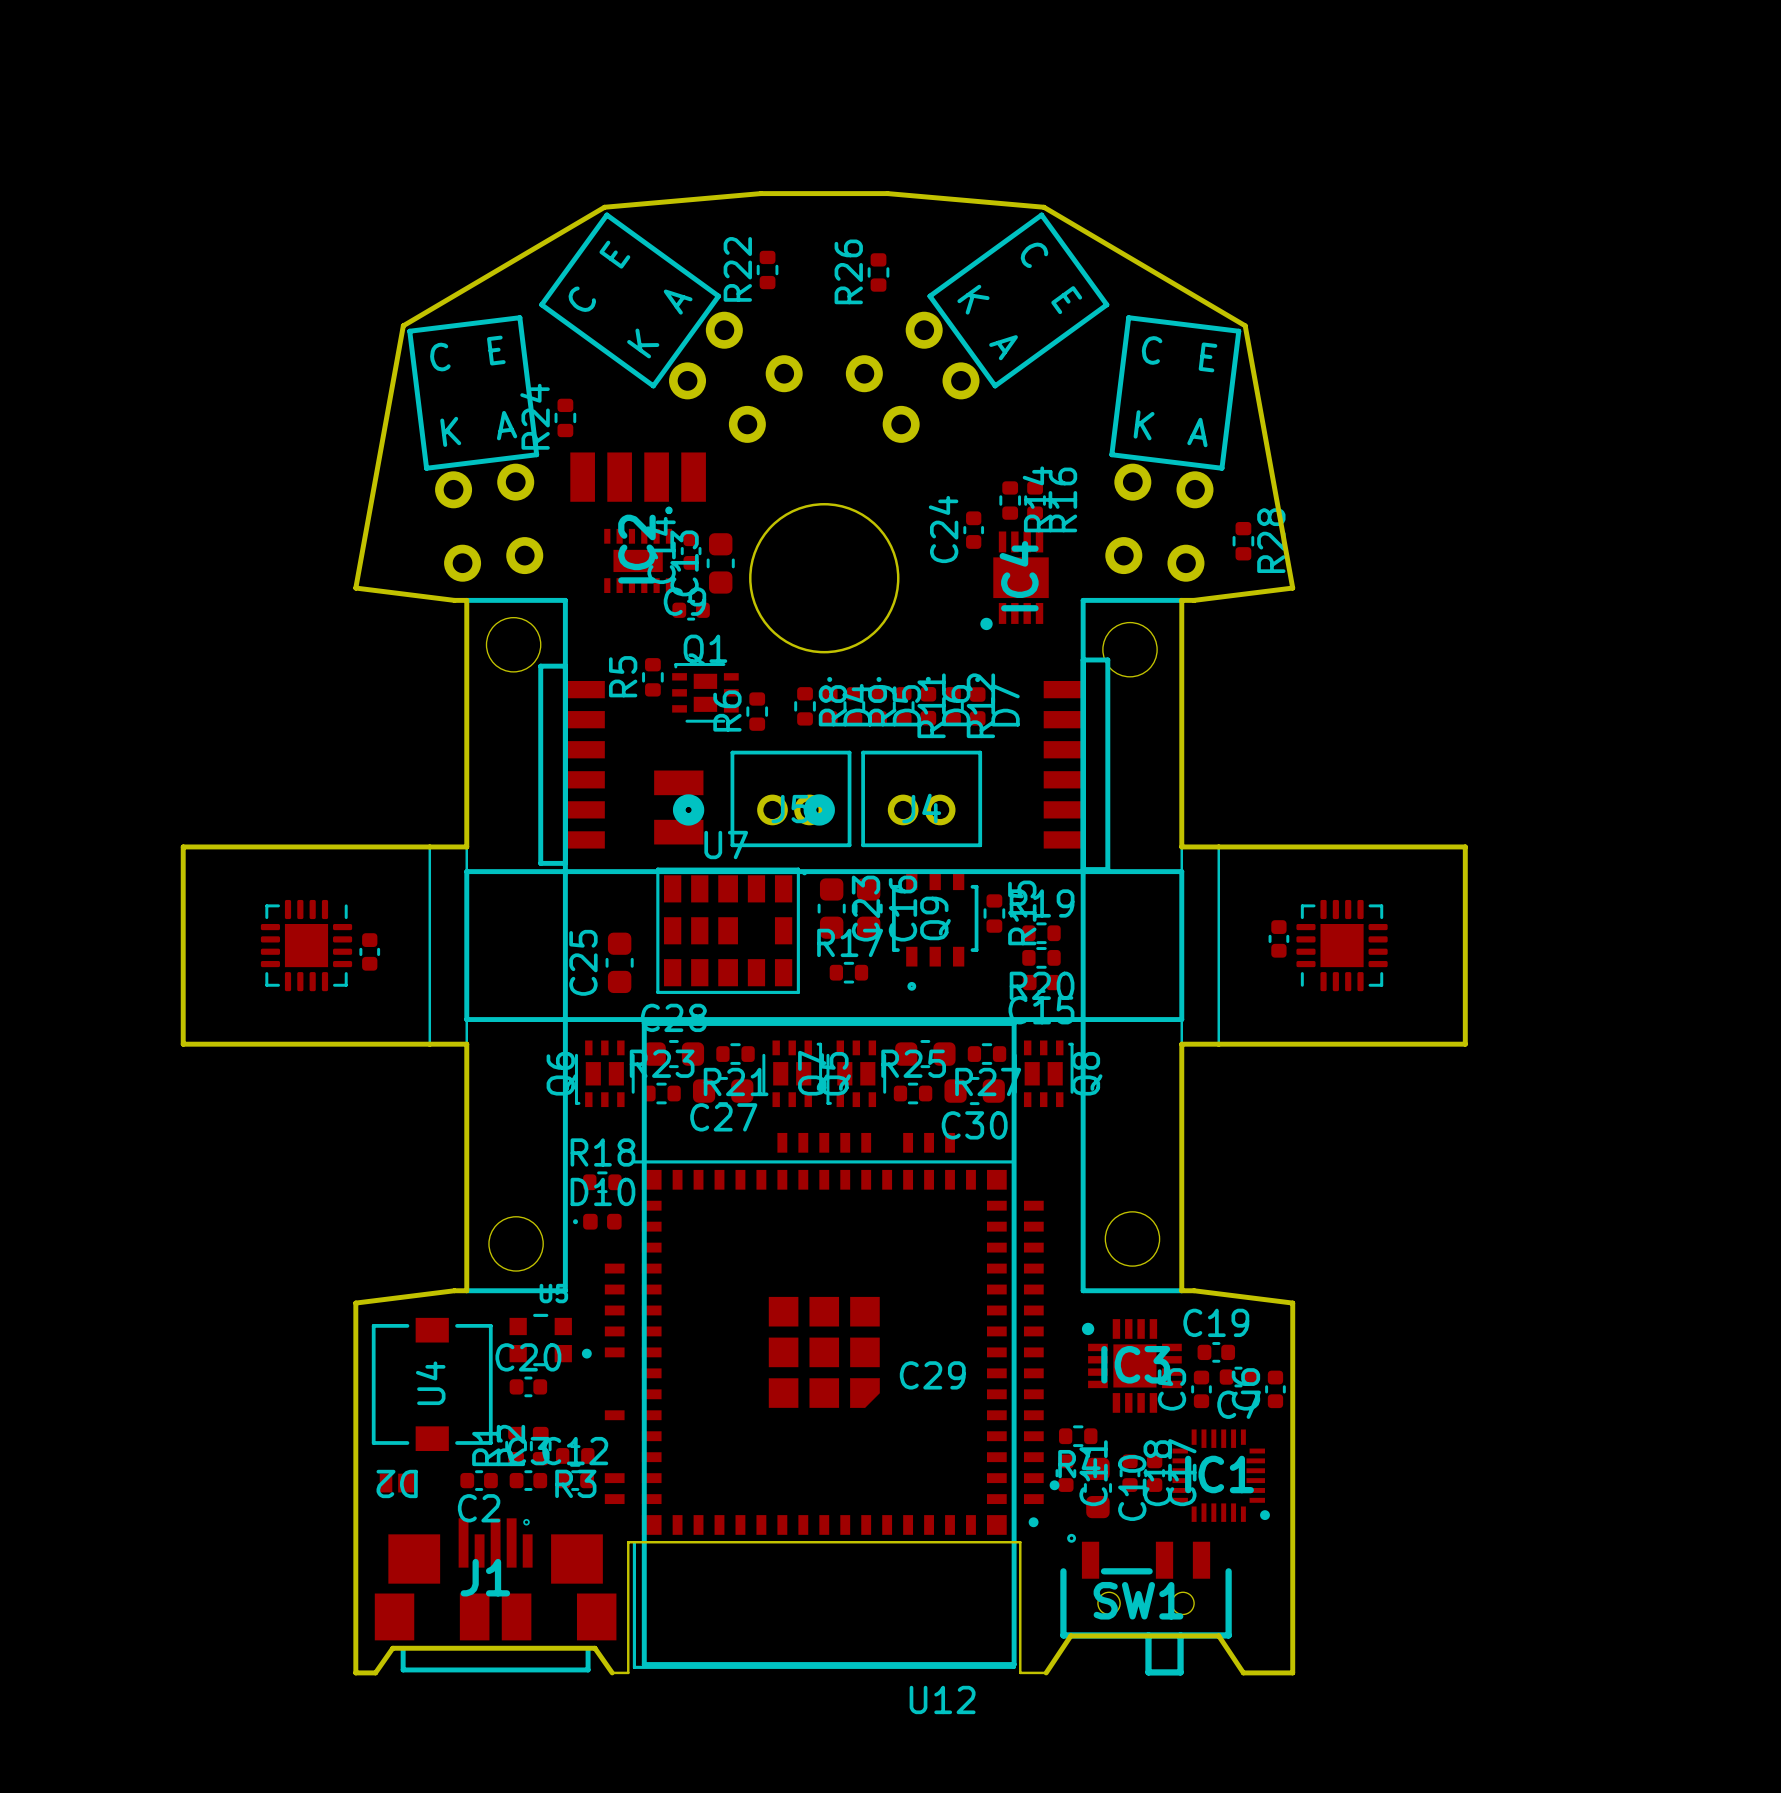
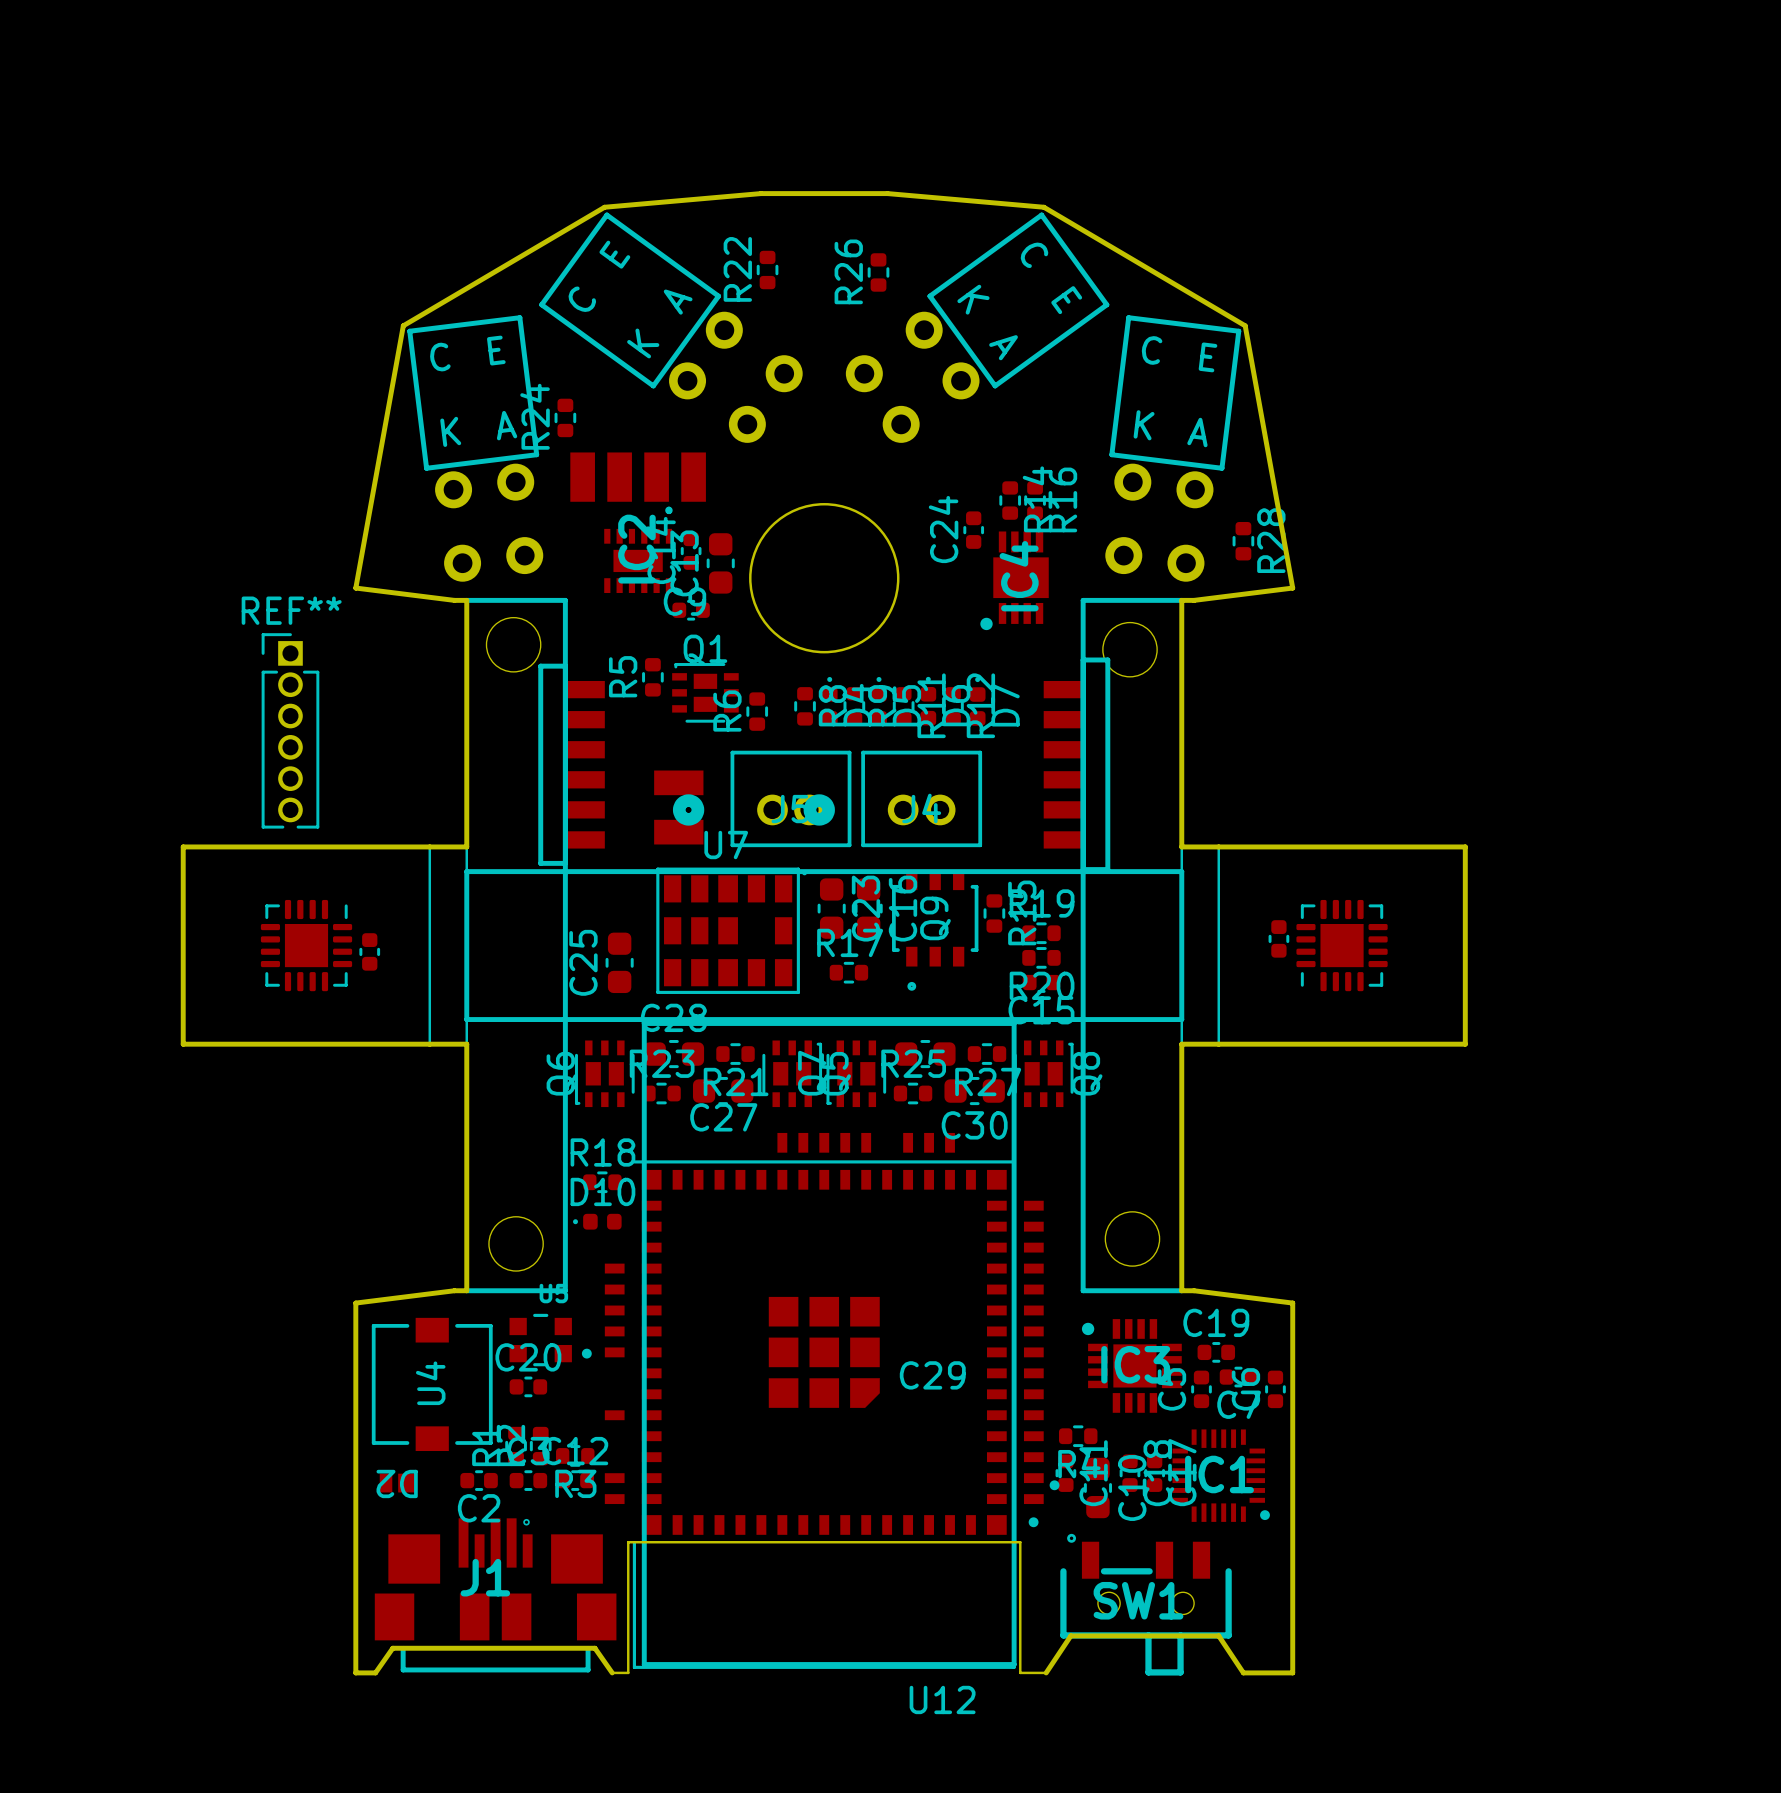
REF**: none -> (290, 730)

